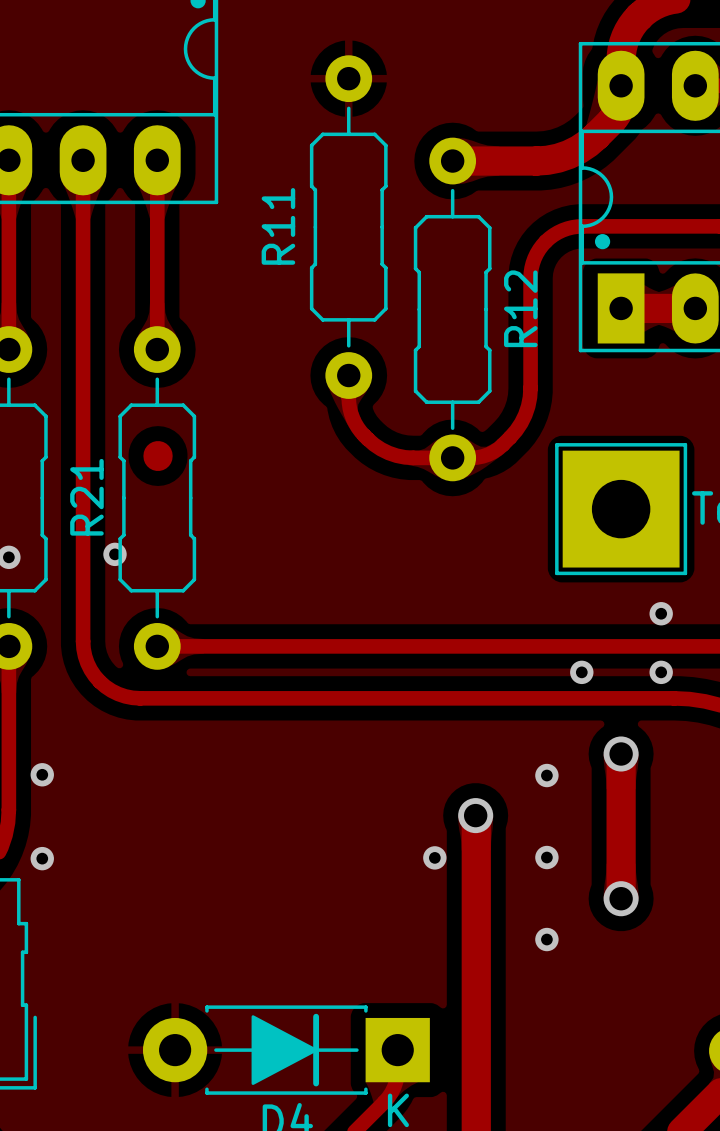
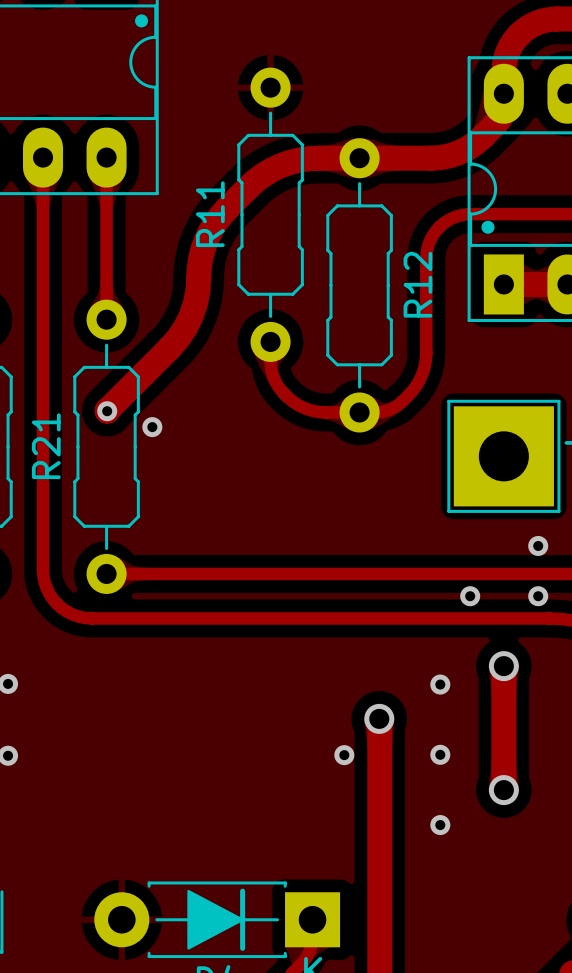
track: none -> (359, 158) (308, 158) (280, 165) (255, 180) (227, 208) (210, 231) (203, 249) (195, 303) (185, 327) (169, 348) (107, 410)
via: none -> (107, 411)
via: none -> (152, 427)
via: (114, 554) -> none

